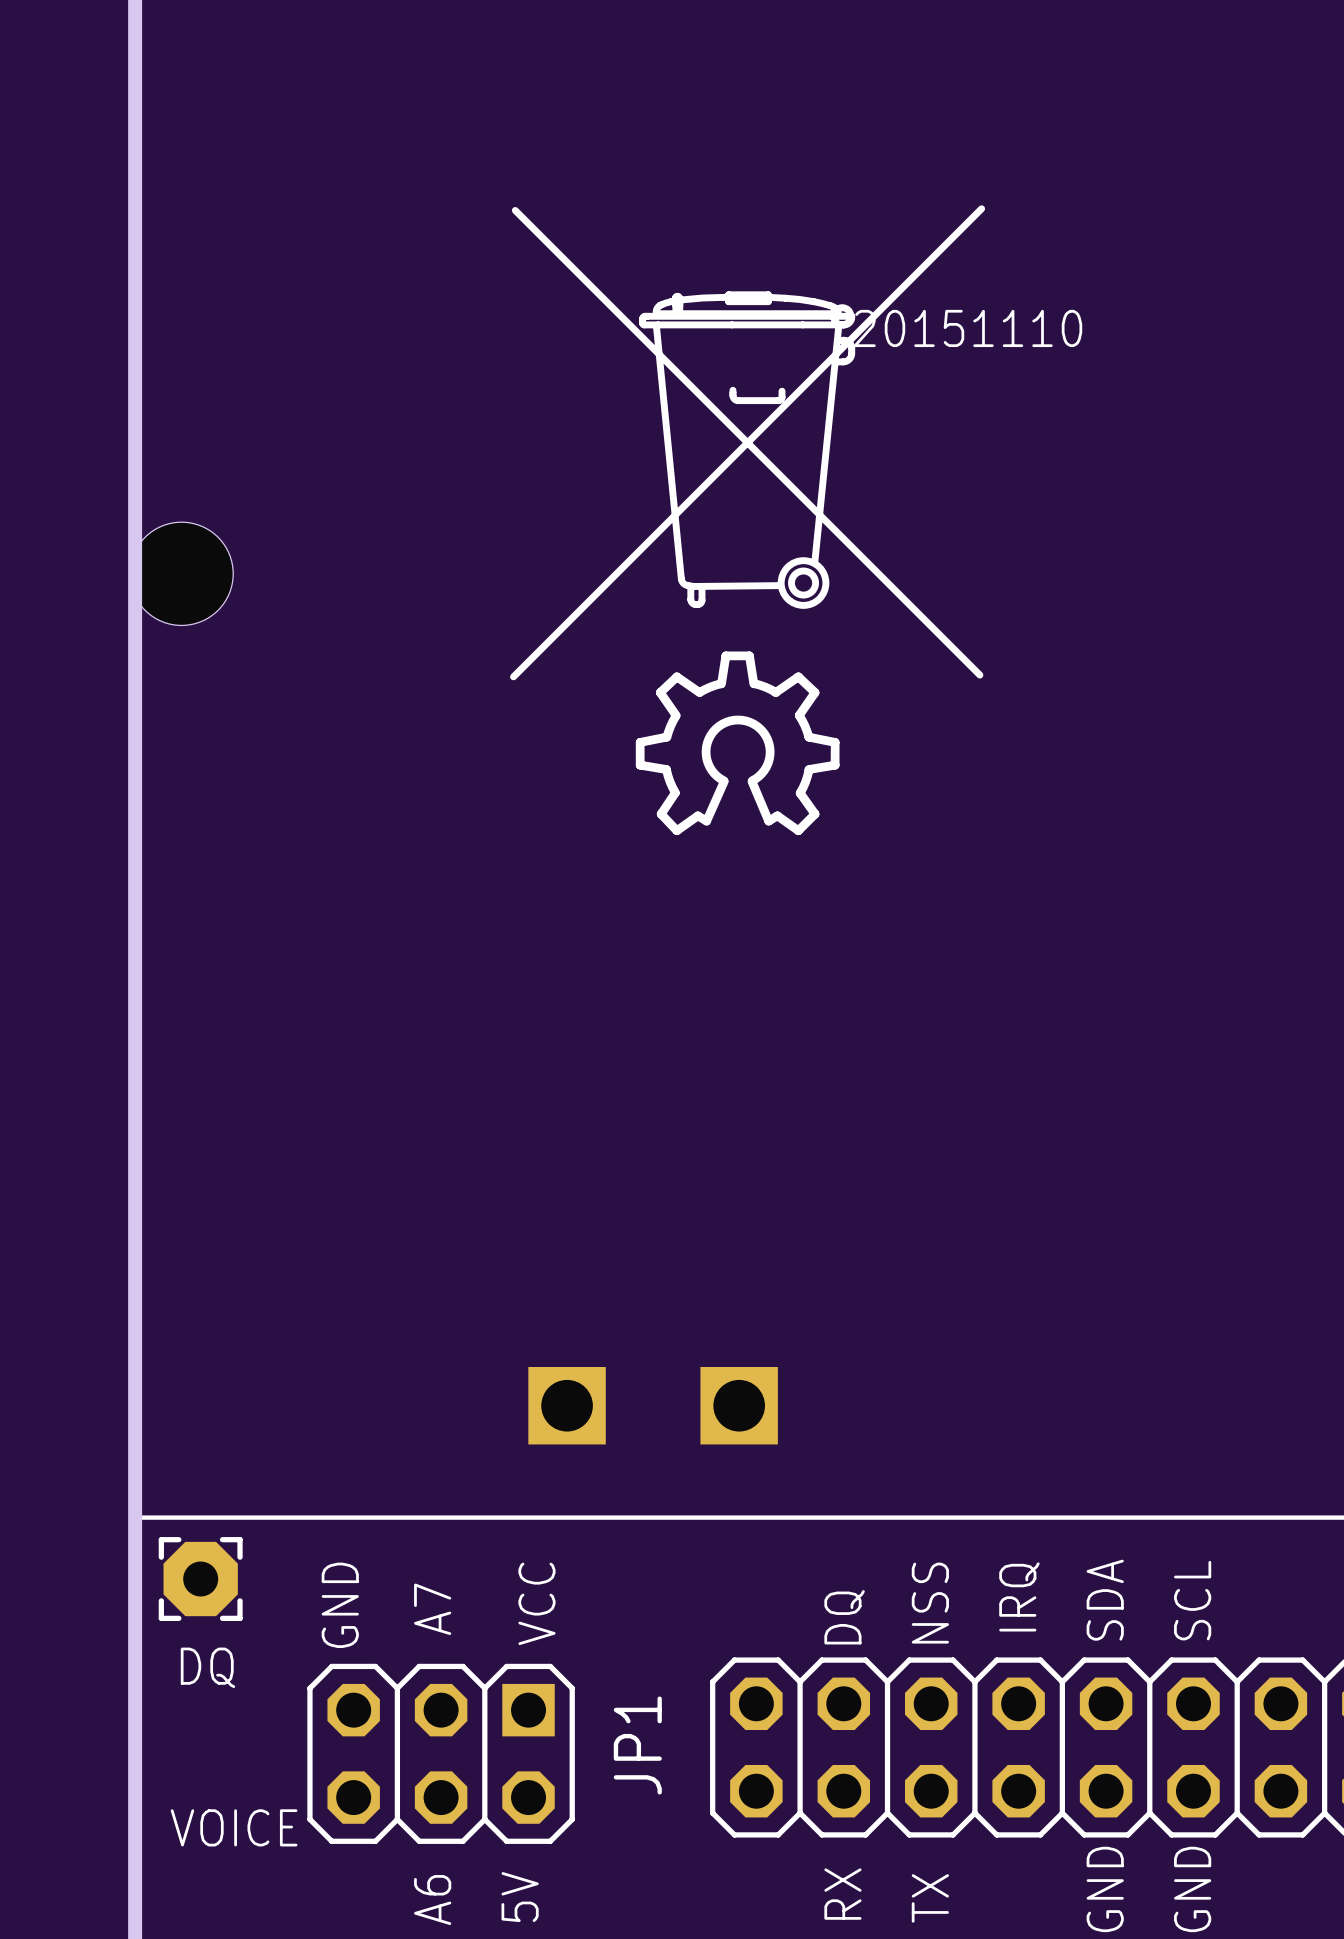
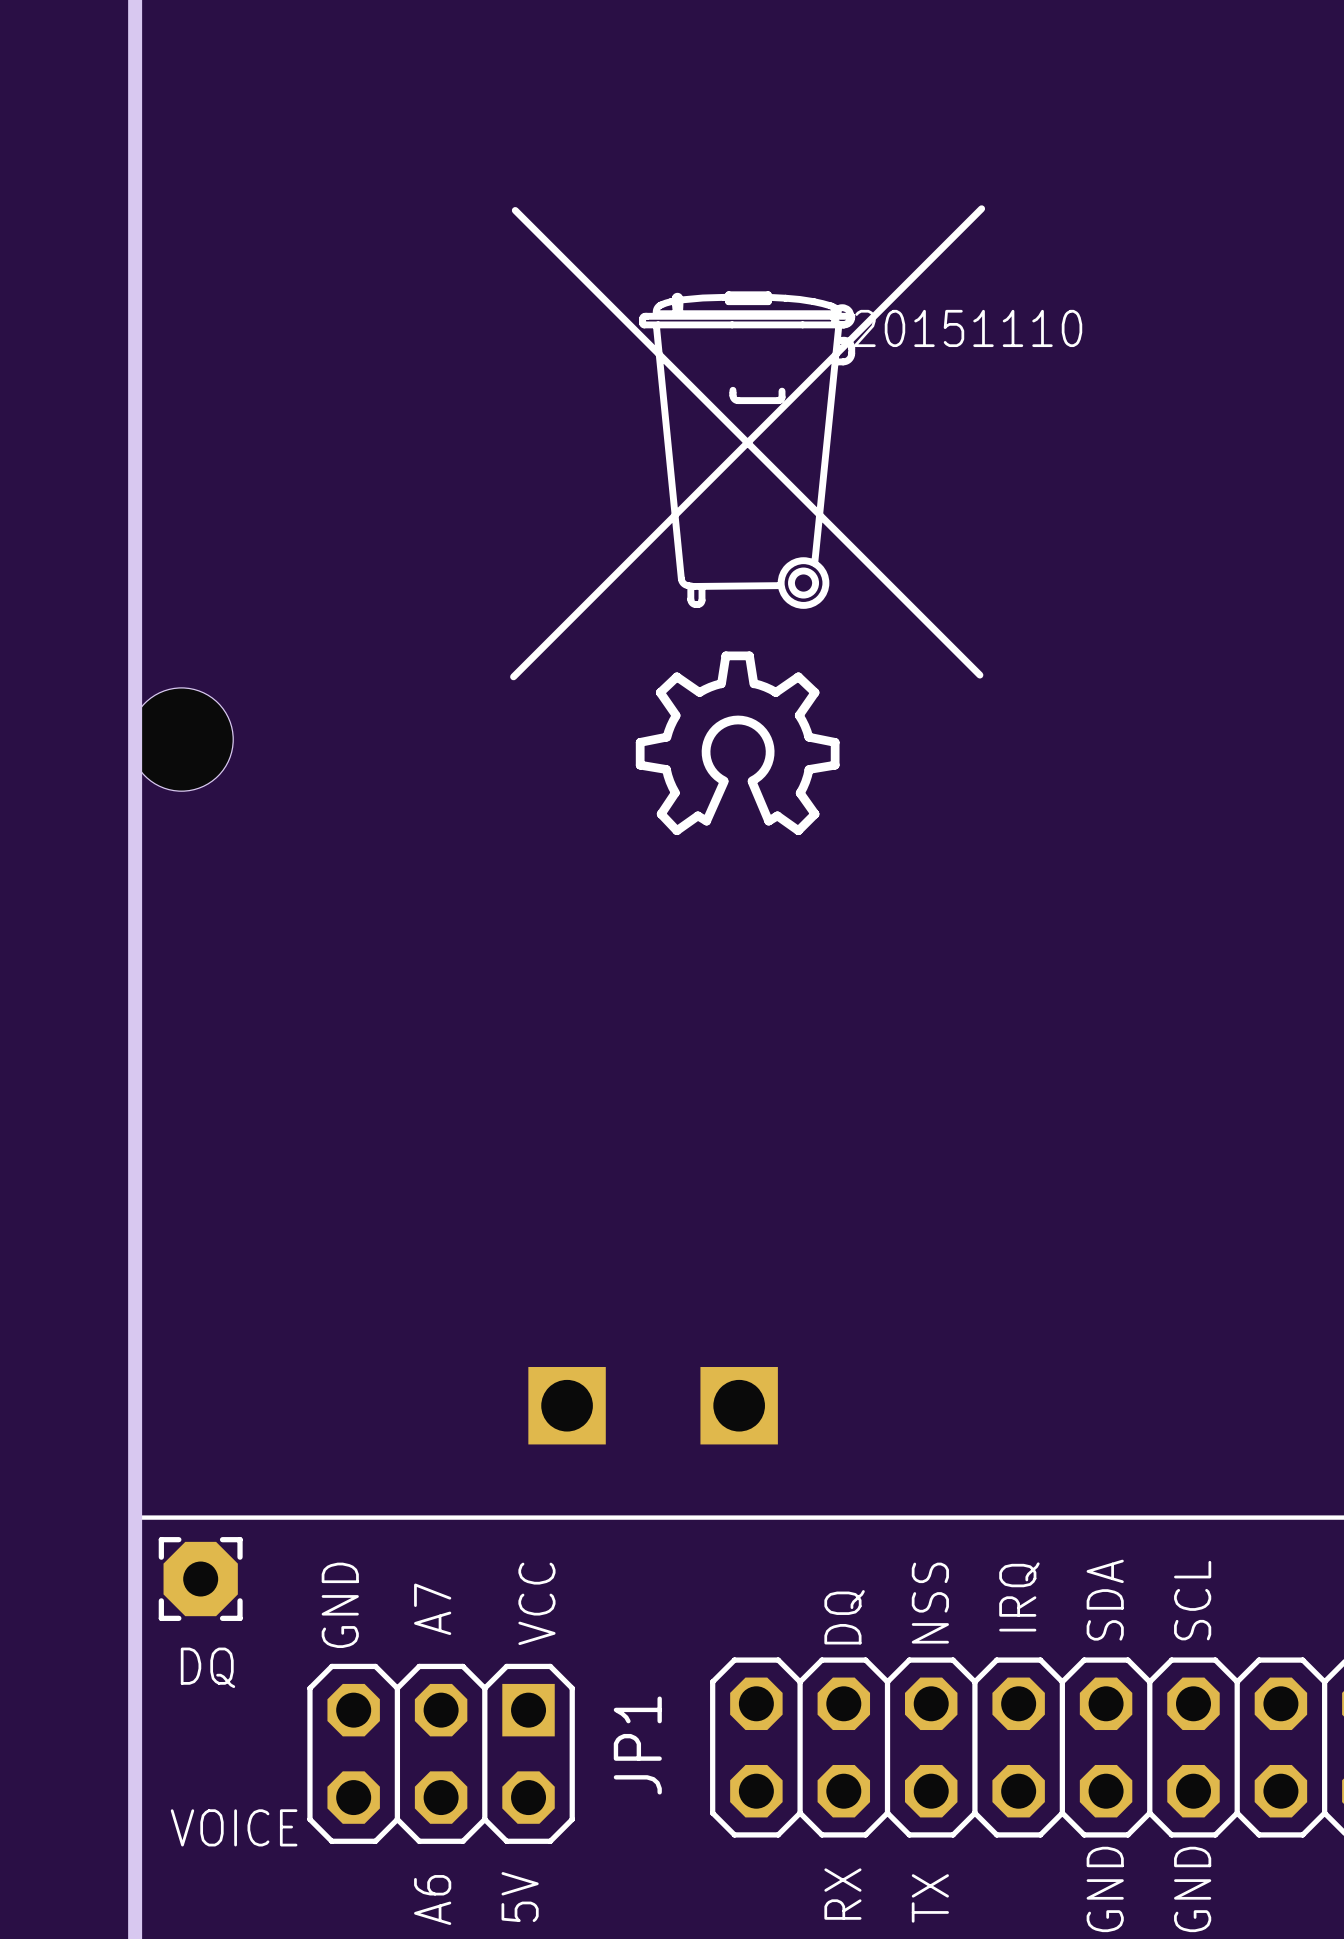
hole position: (181, 573) -> (181, 739)

